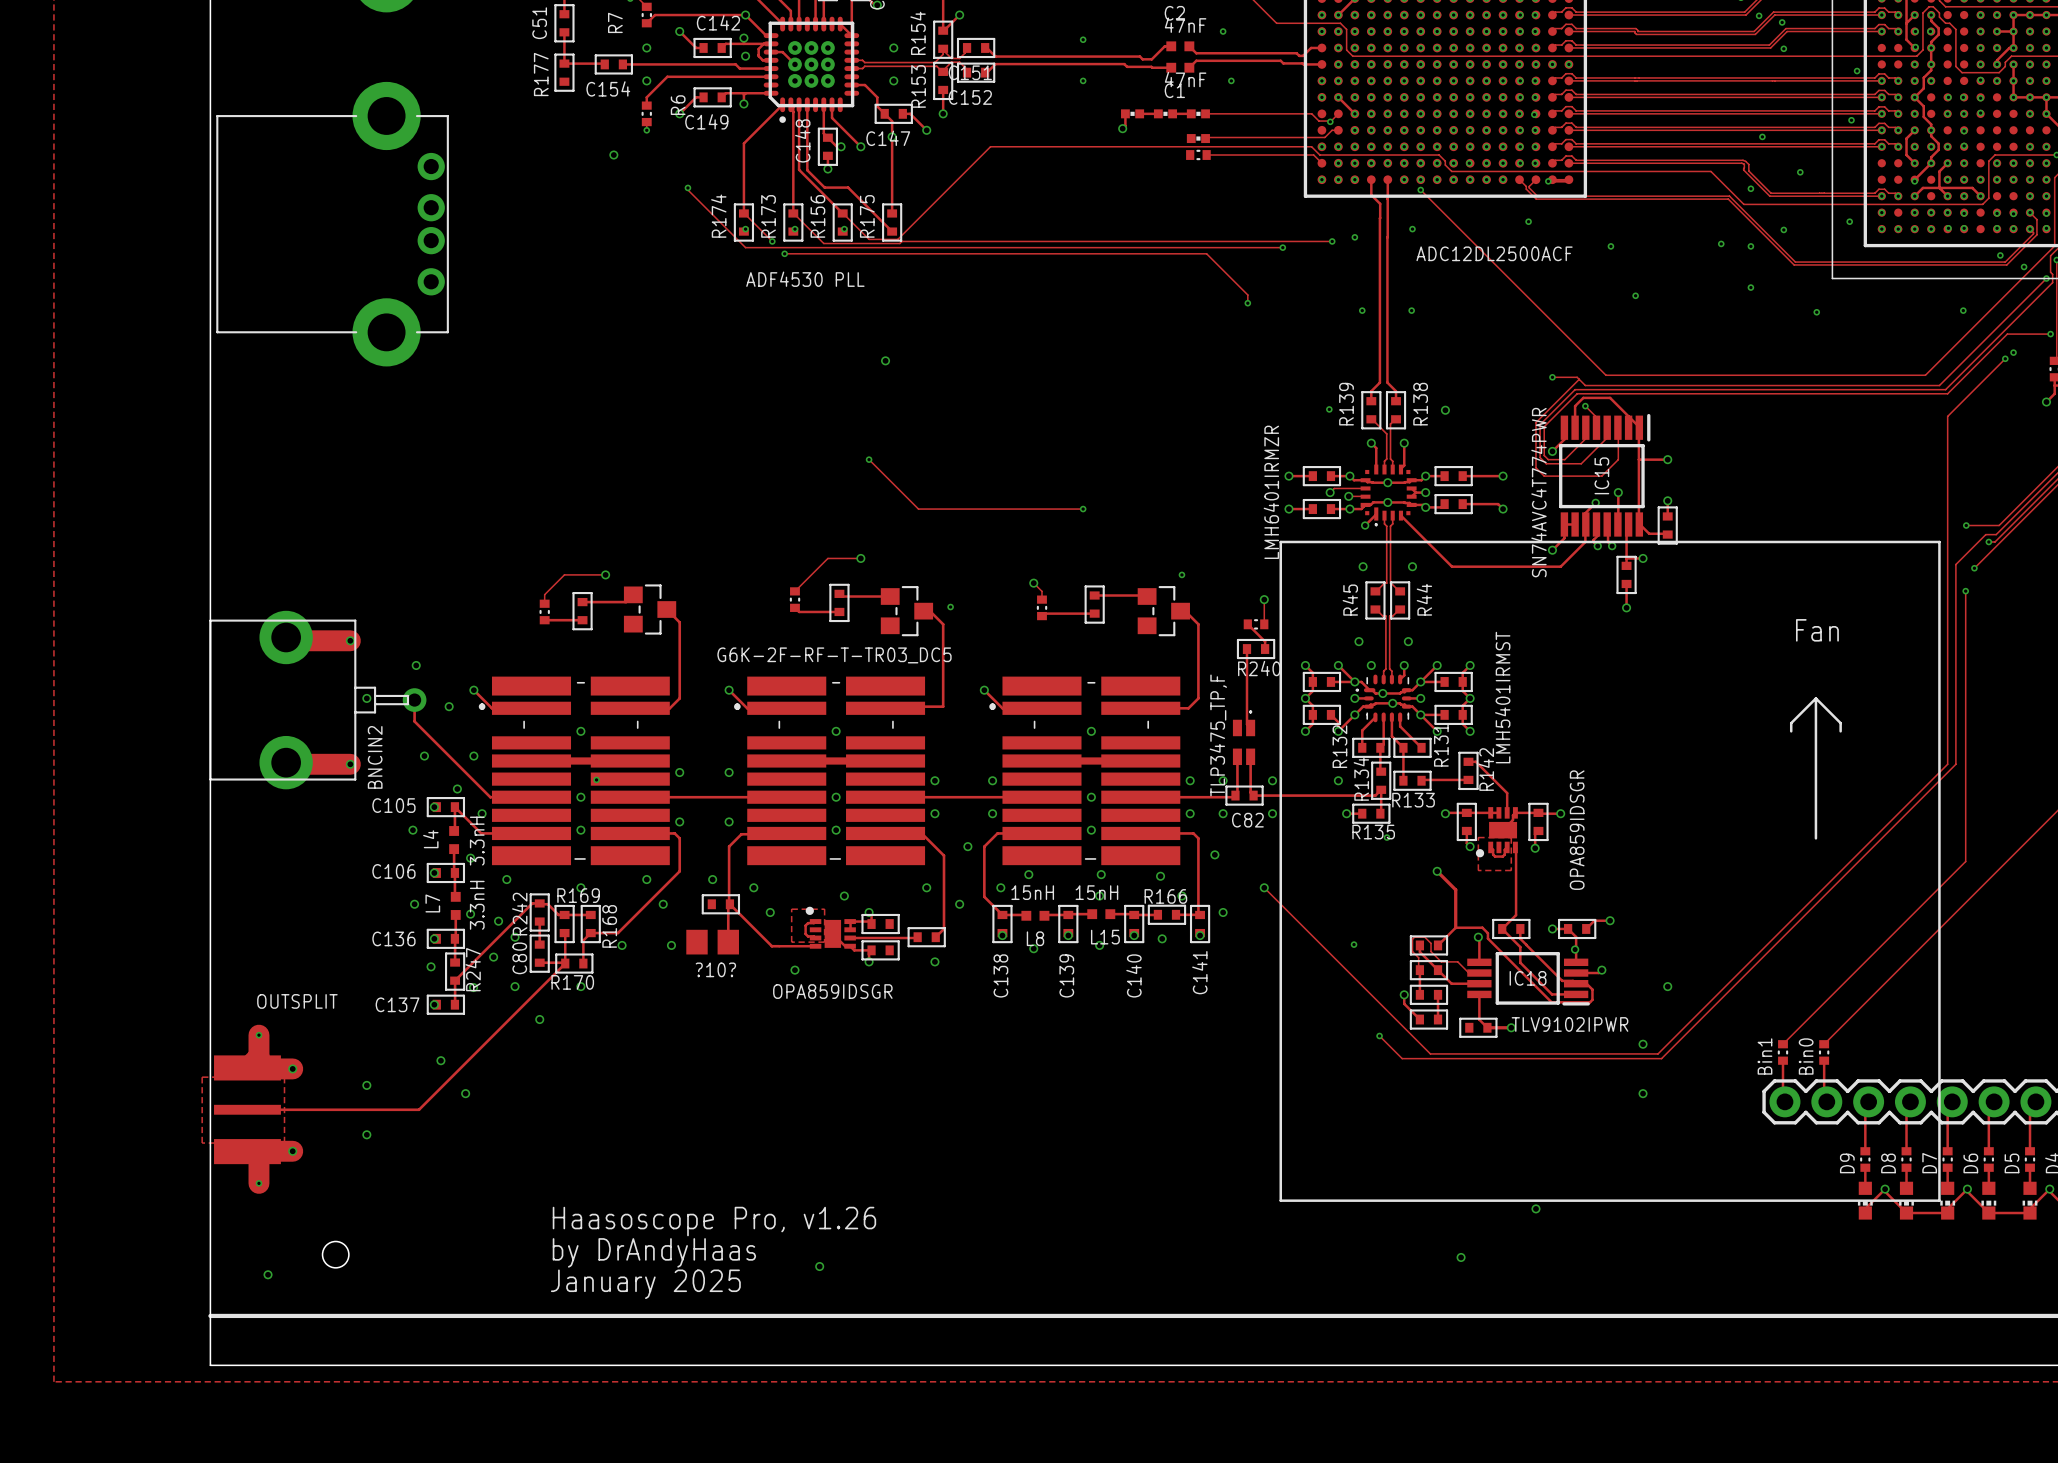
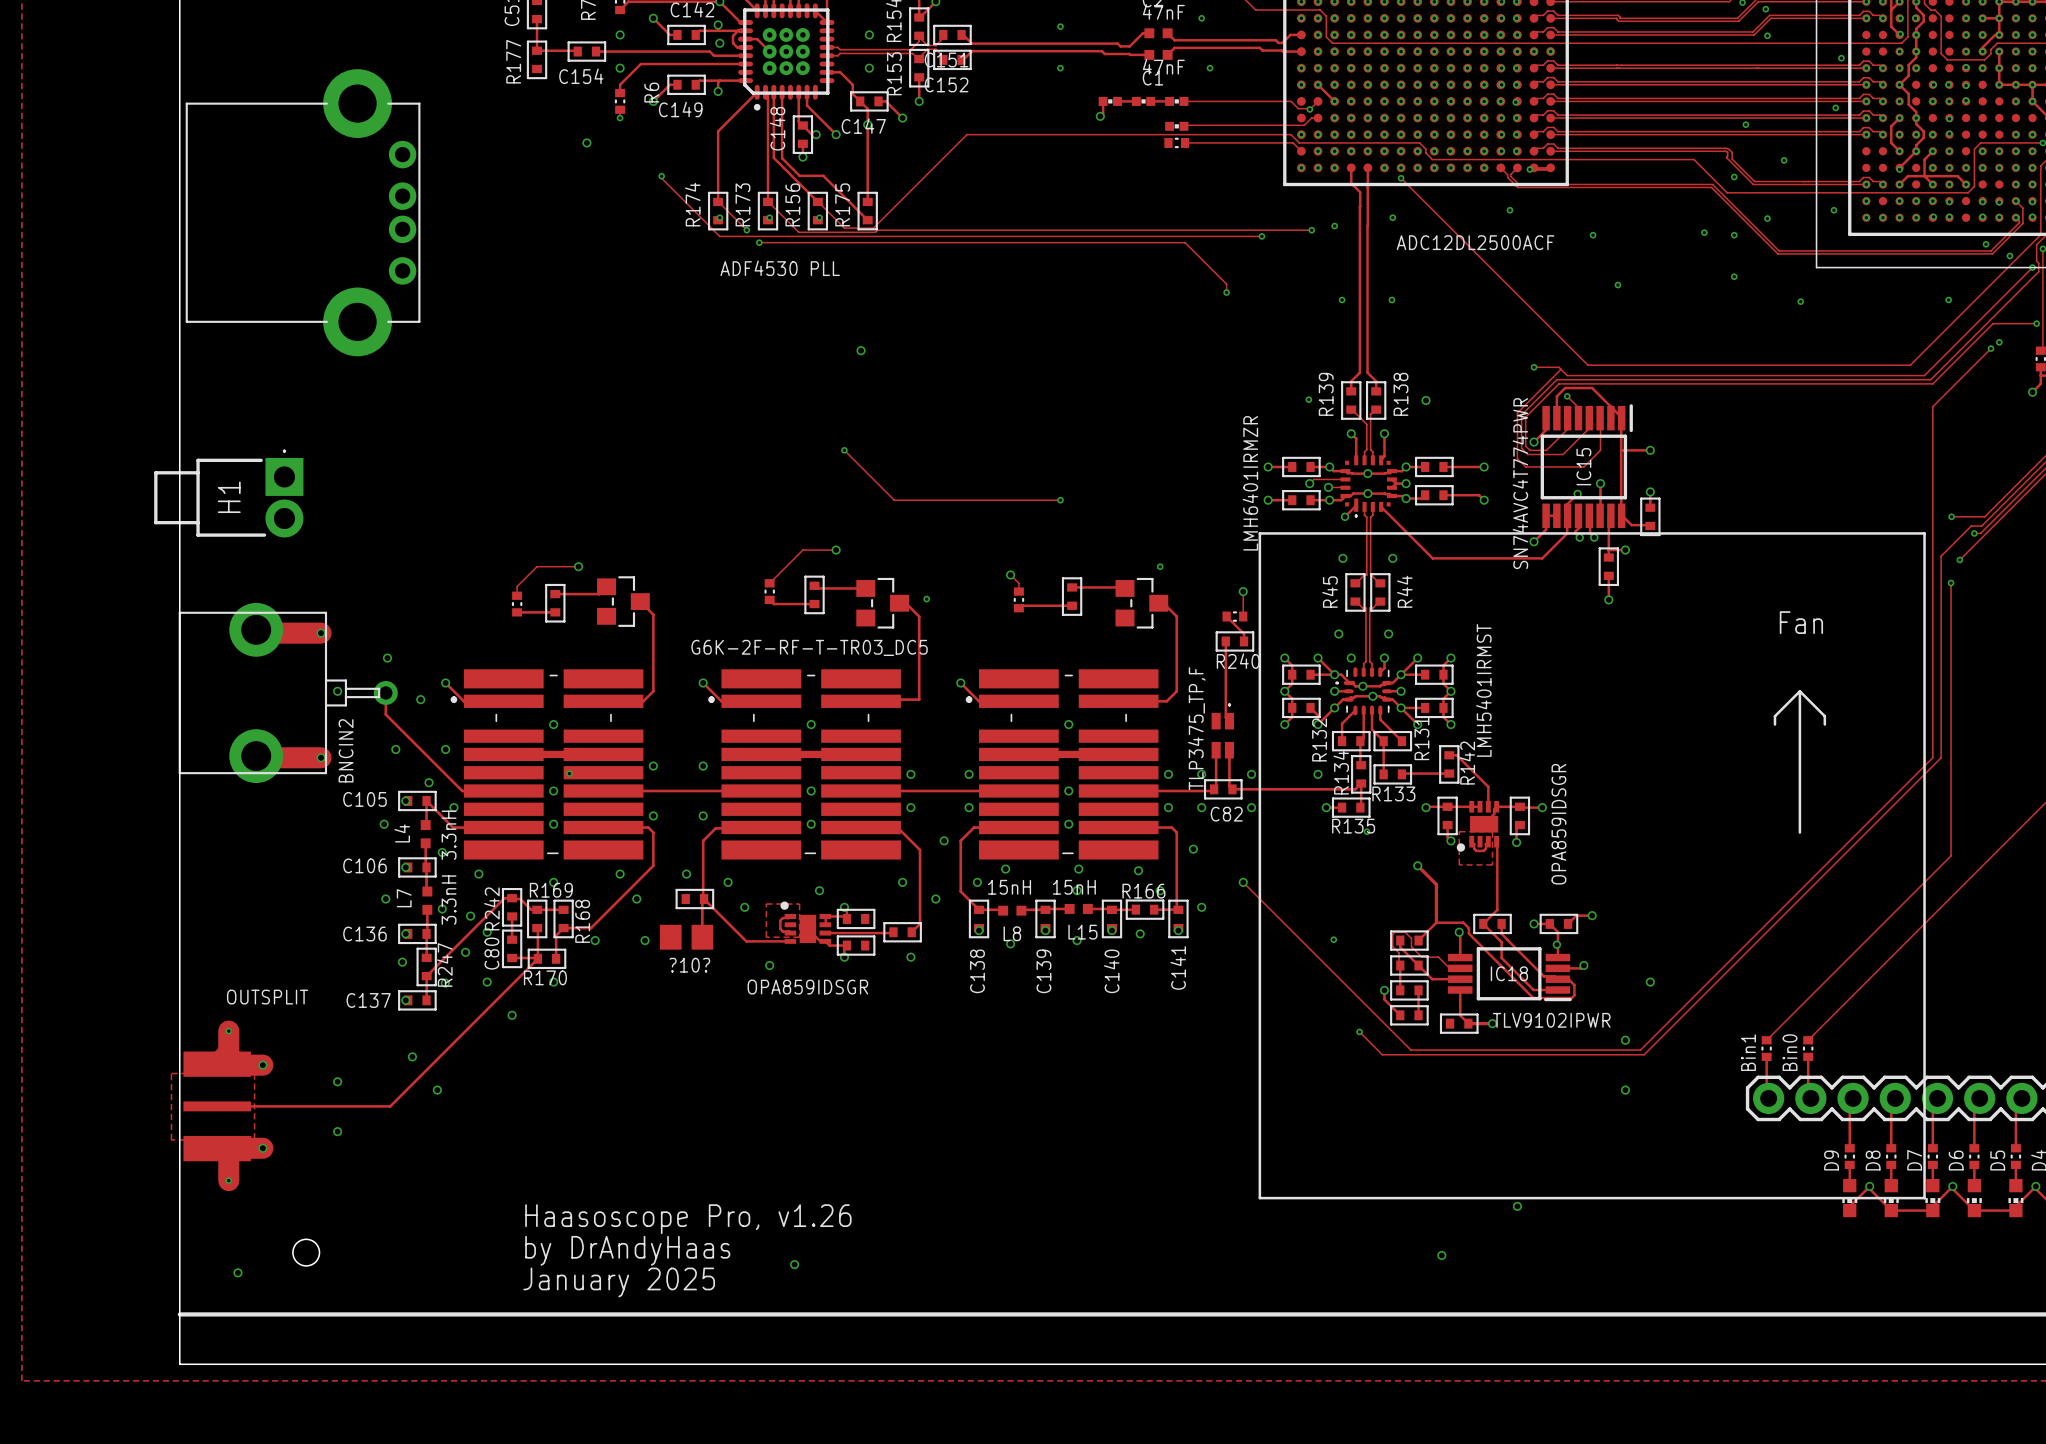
H1: none -> (228, 493)

